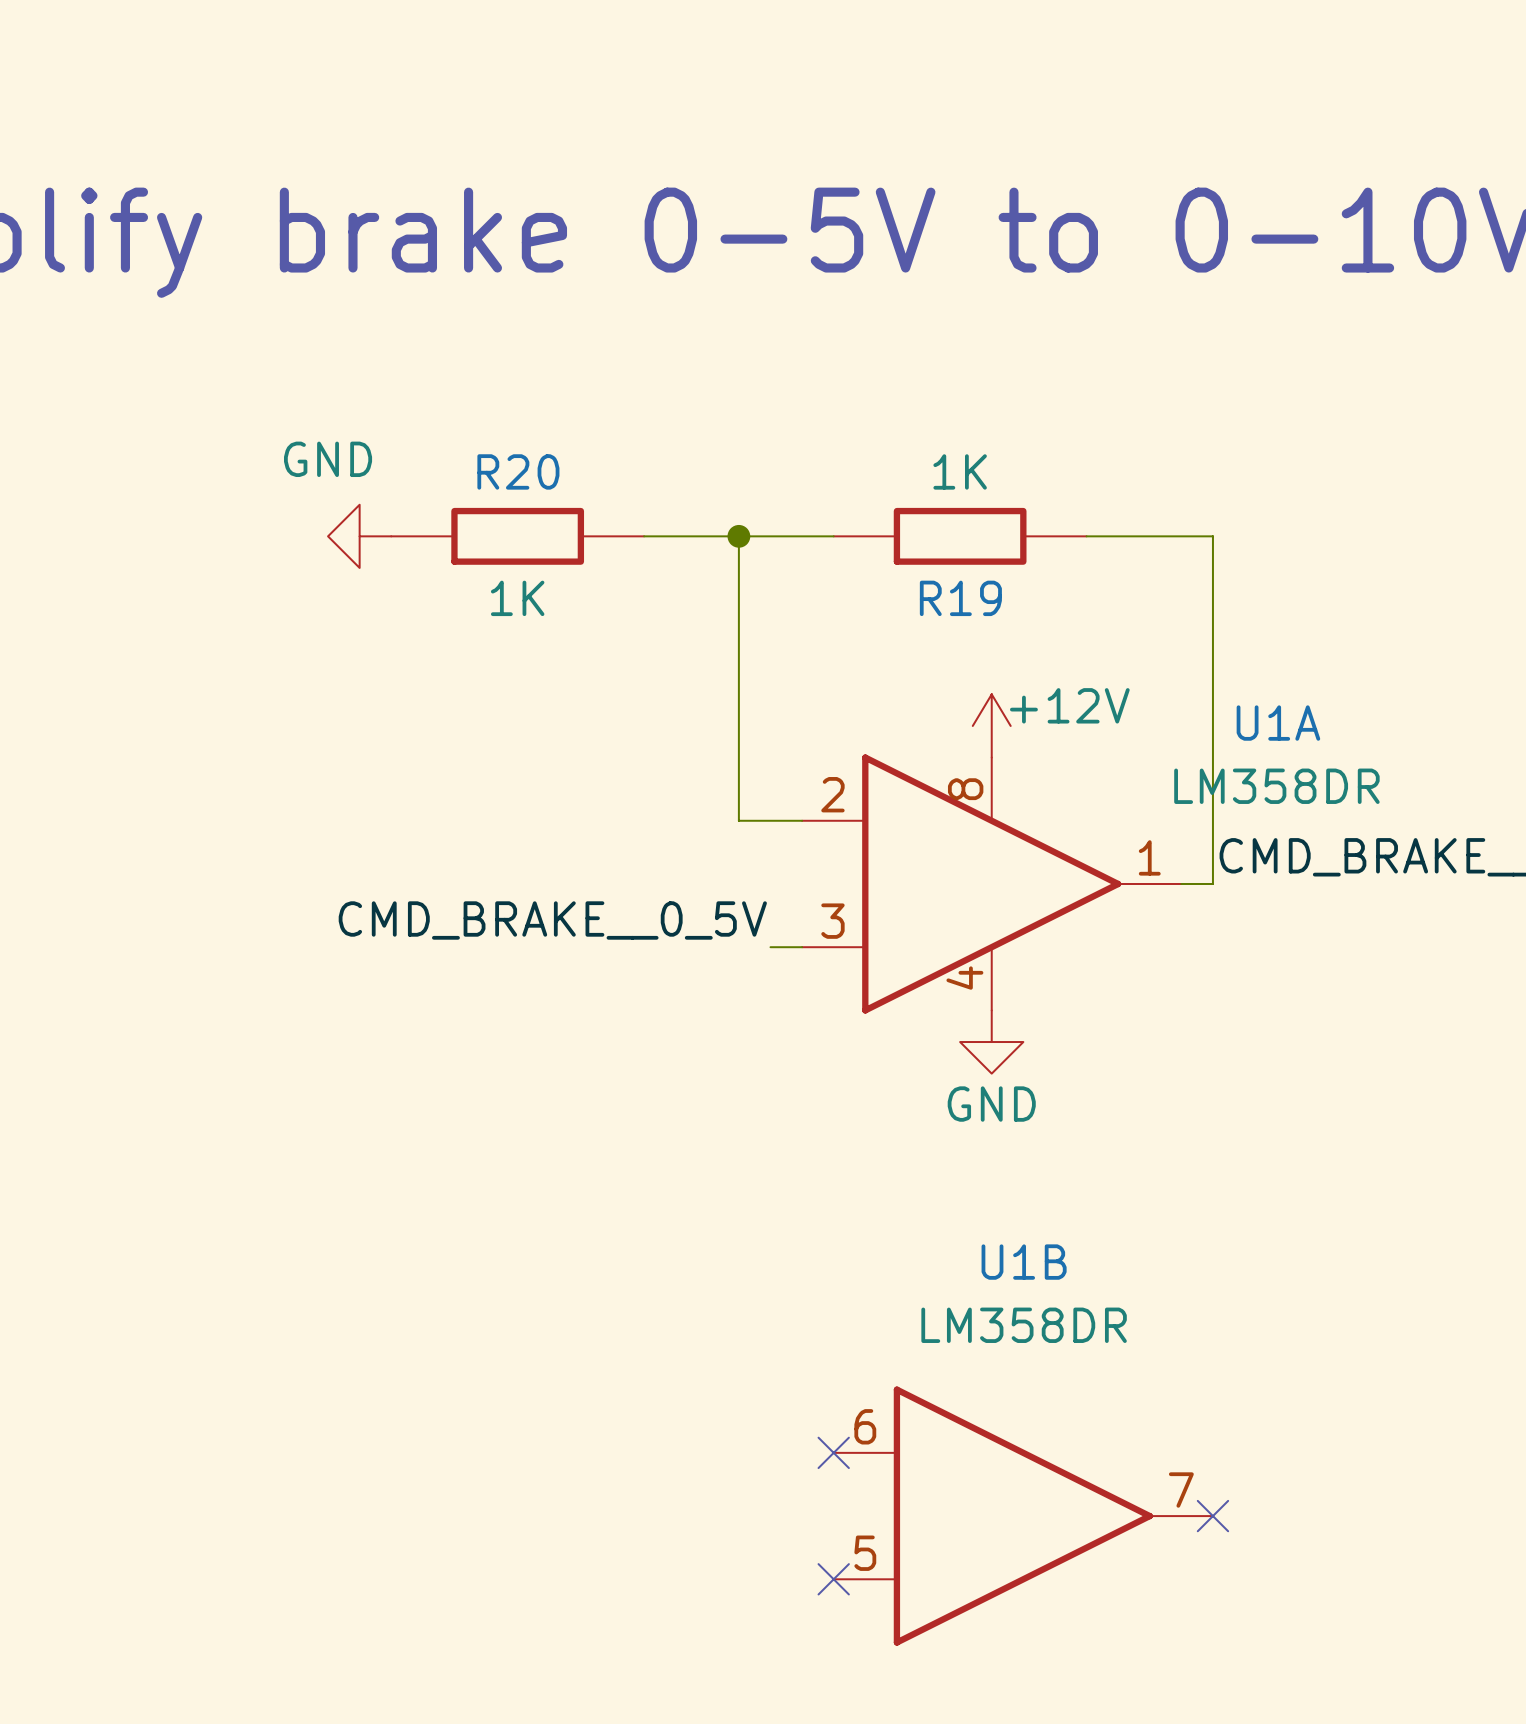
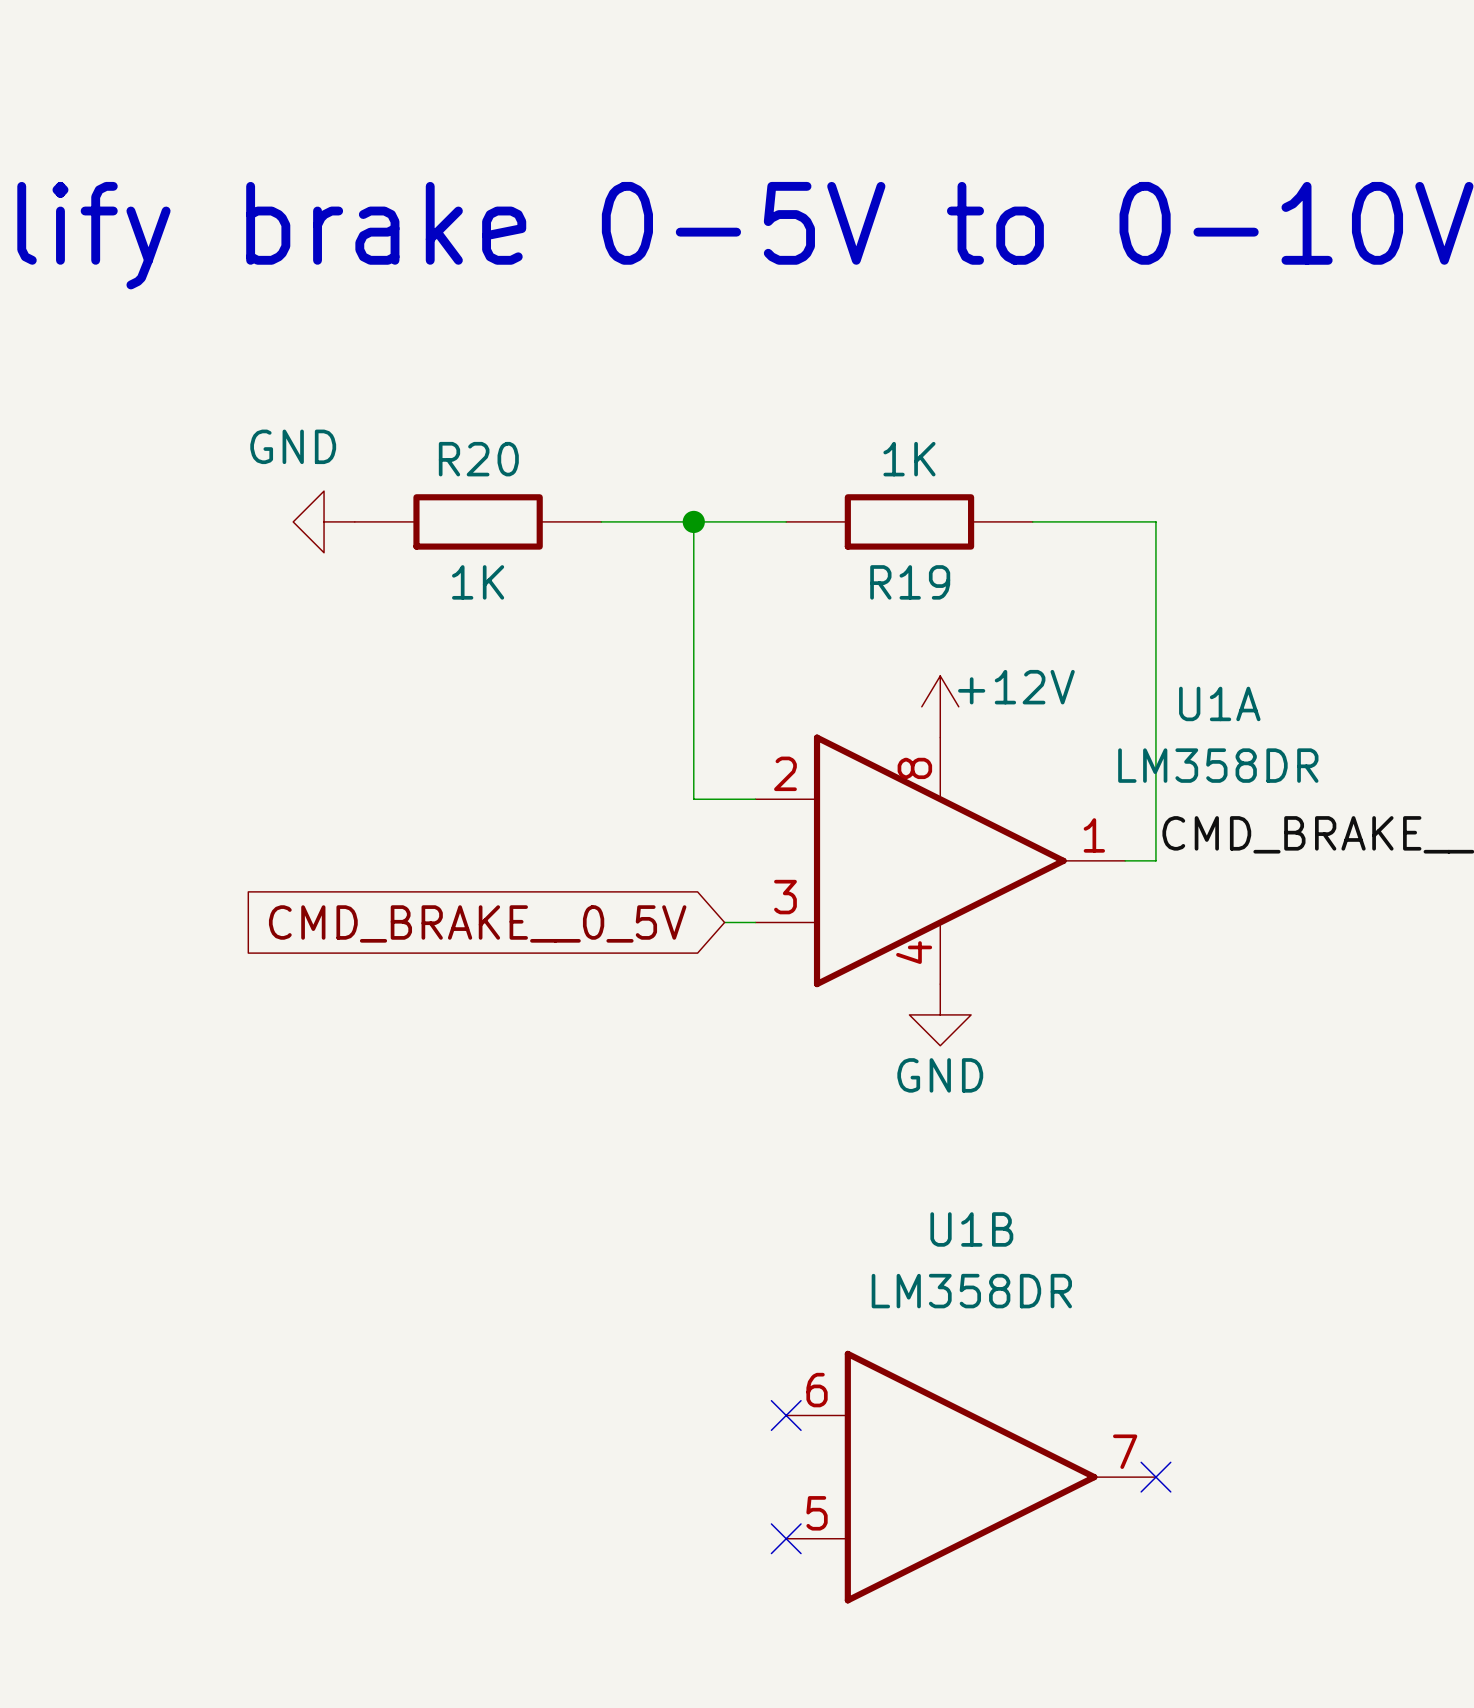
label: CMD_BRAKE__0_5V (552, 920) -> none
global label: none -> CMD_BRAKE__0_5V (477, 923)

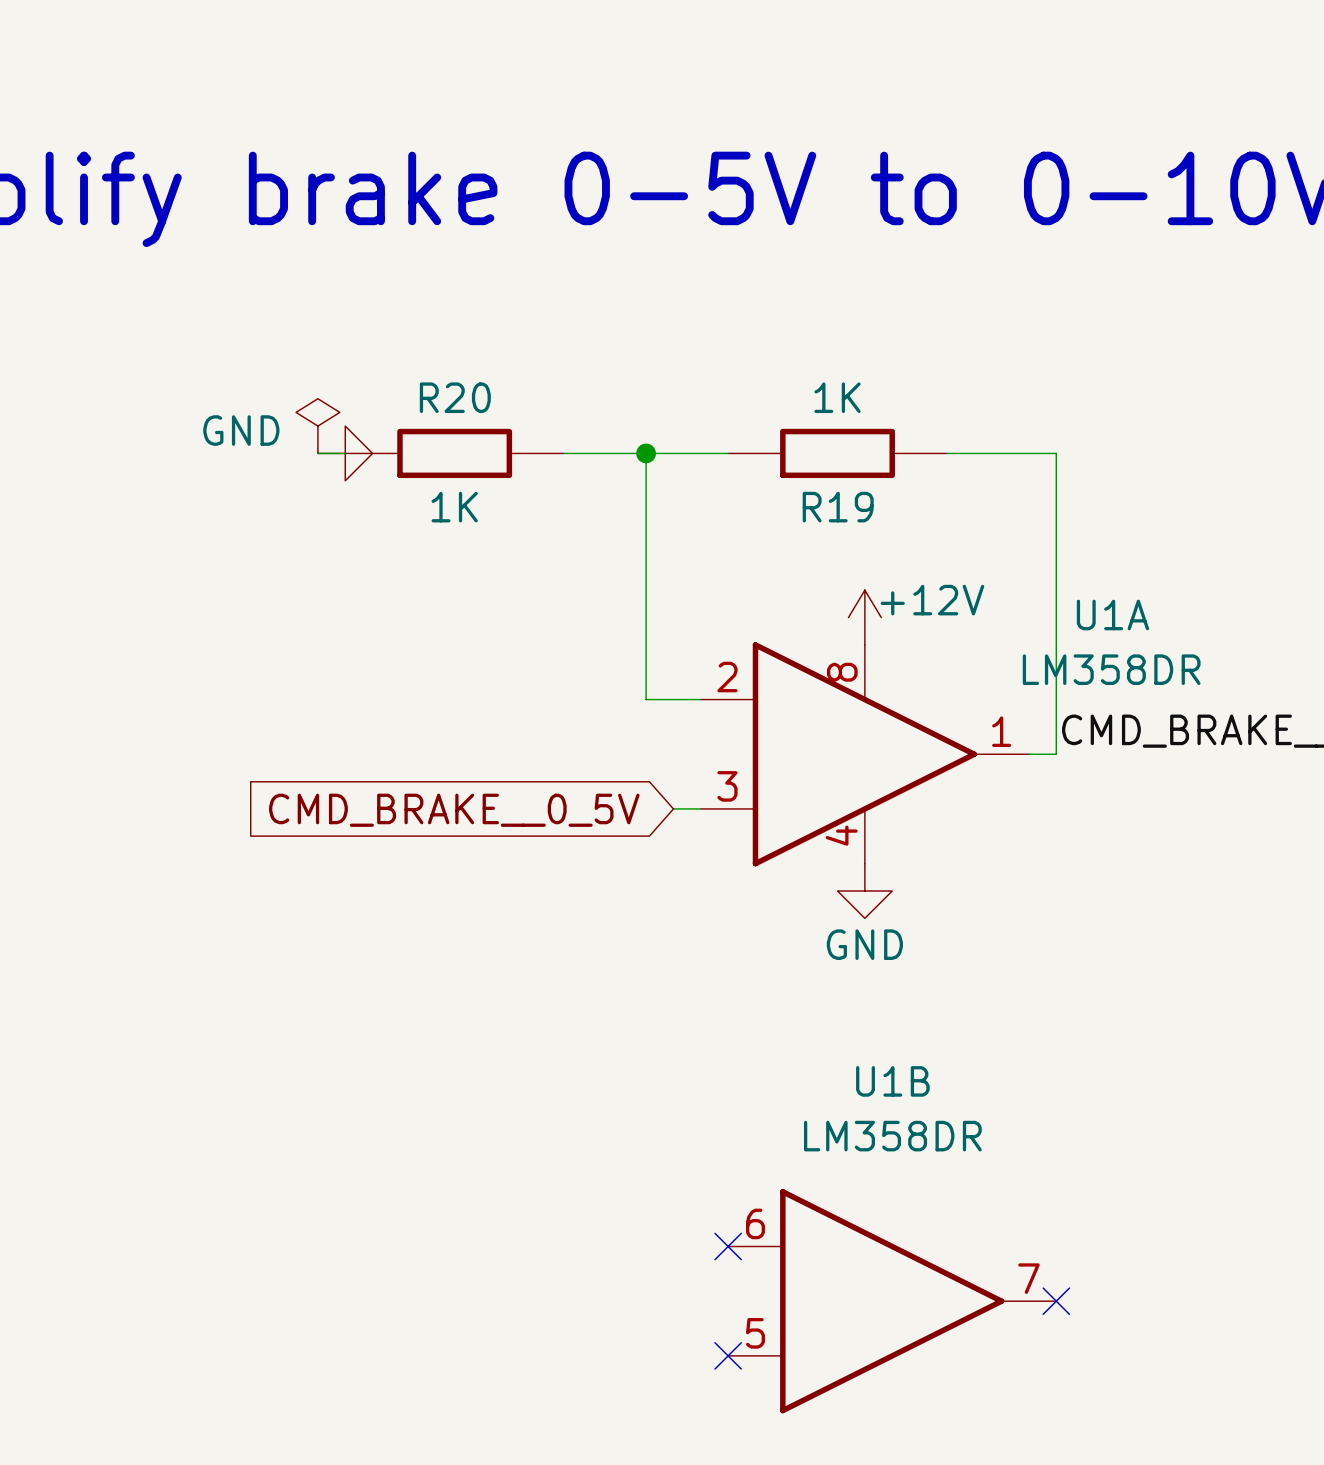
power symbol text position: GND (293, 446) -> GND (241, 430)
power symbol: none -> (317, 426)
power symbol rotation: 0° (324, 521) -> 180° (345, 453)

